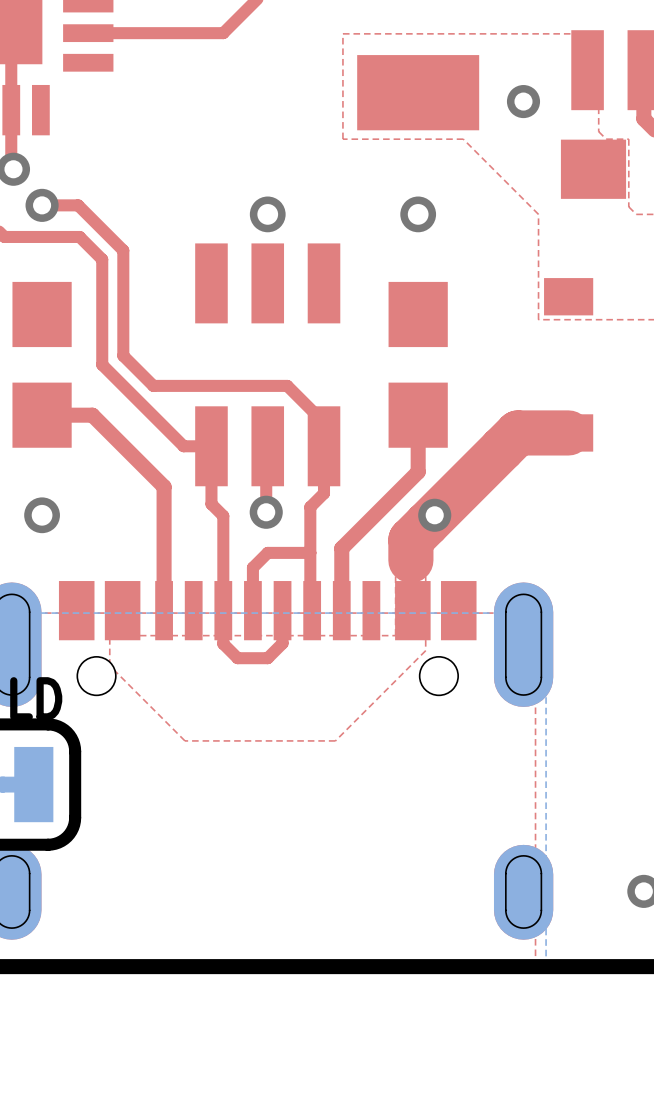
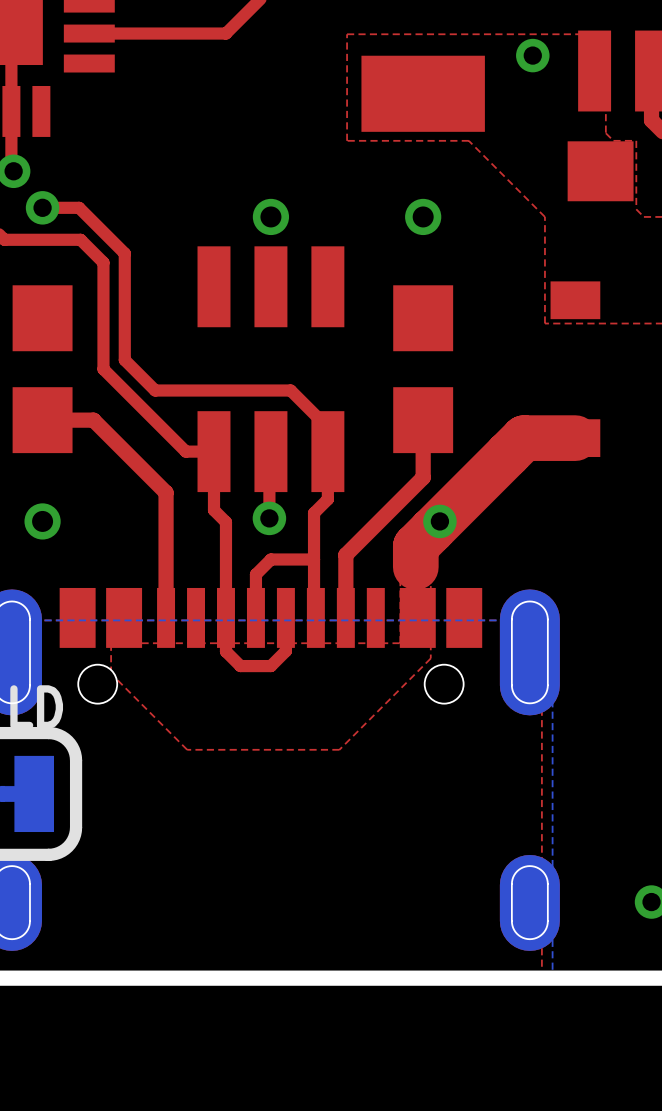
via position: (523, 101) -> (532, 55)

